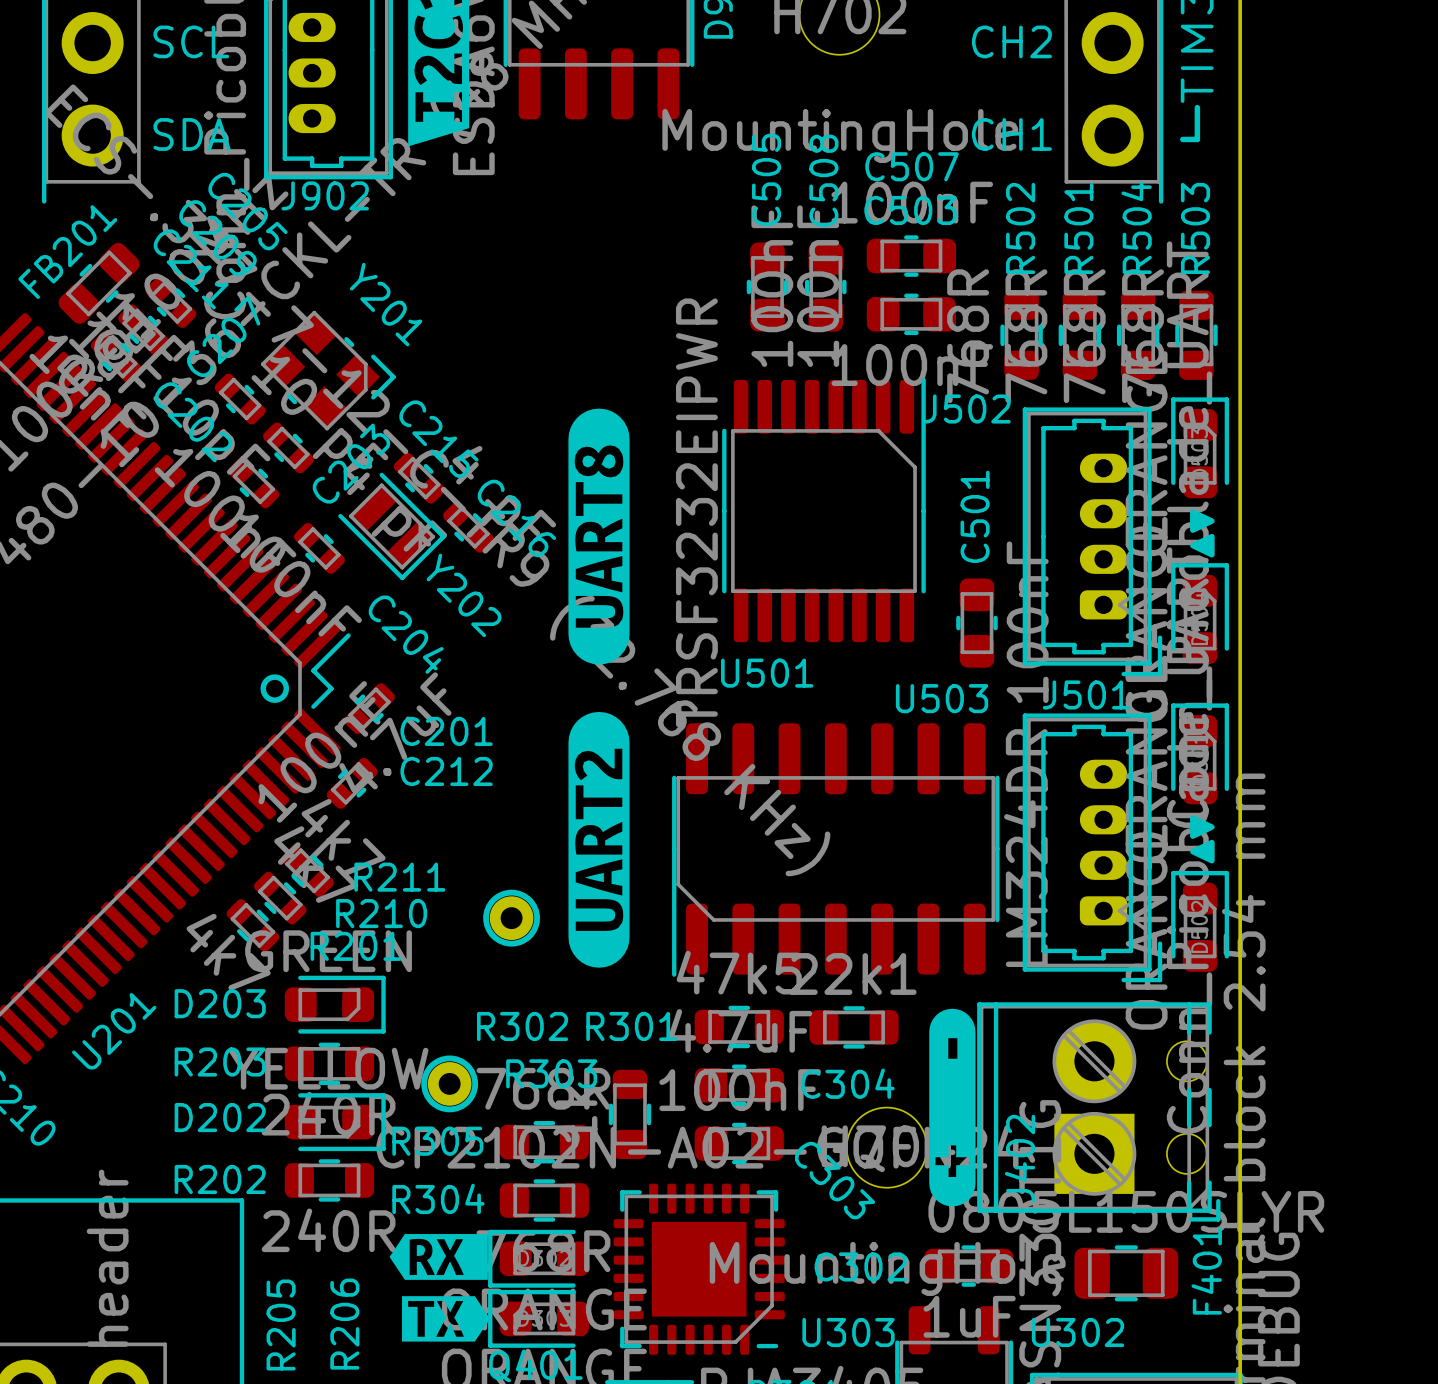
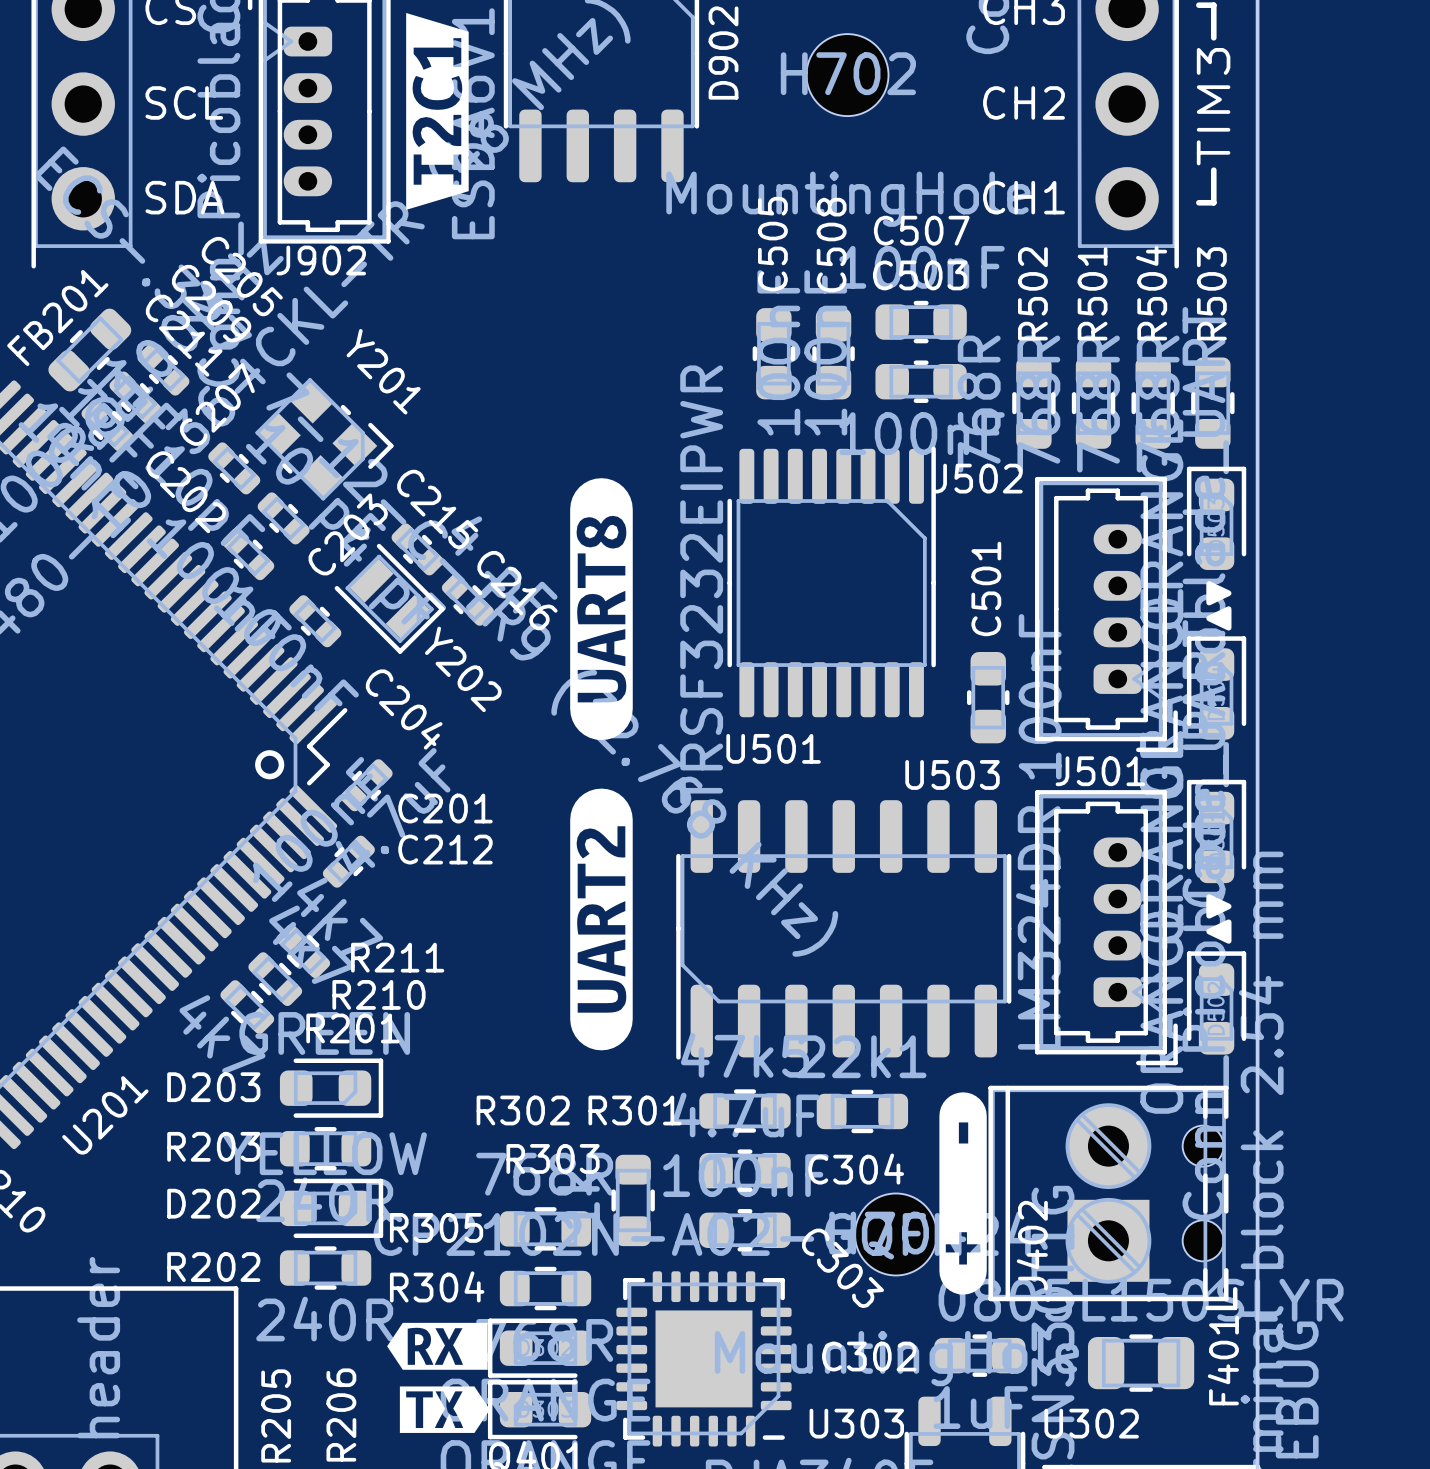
part: (511, 918) -> none
part: (449, 1083) -> none

